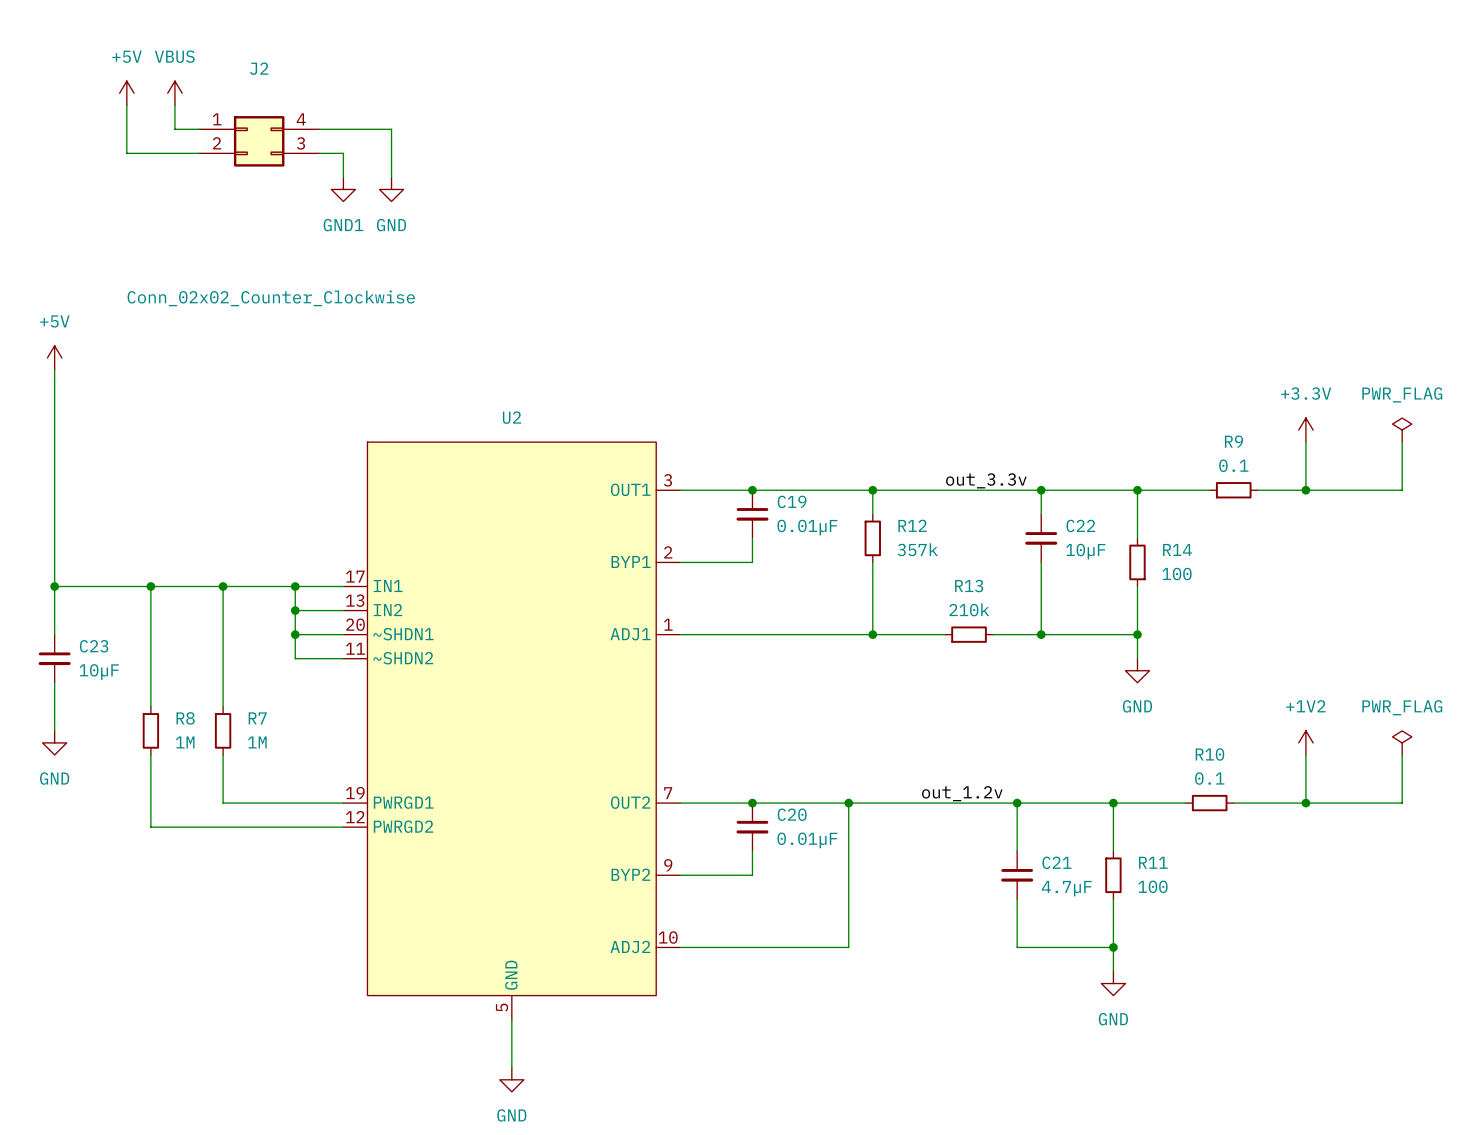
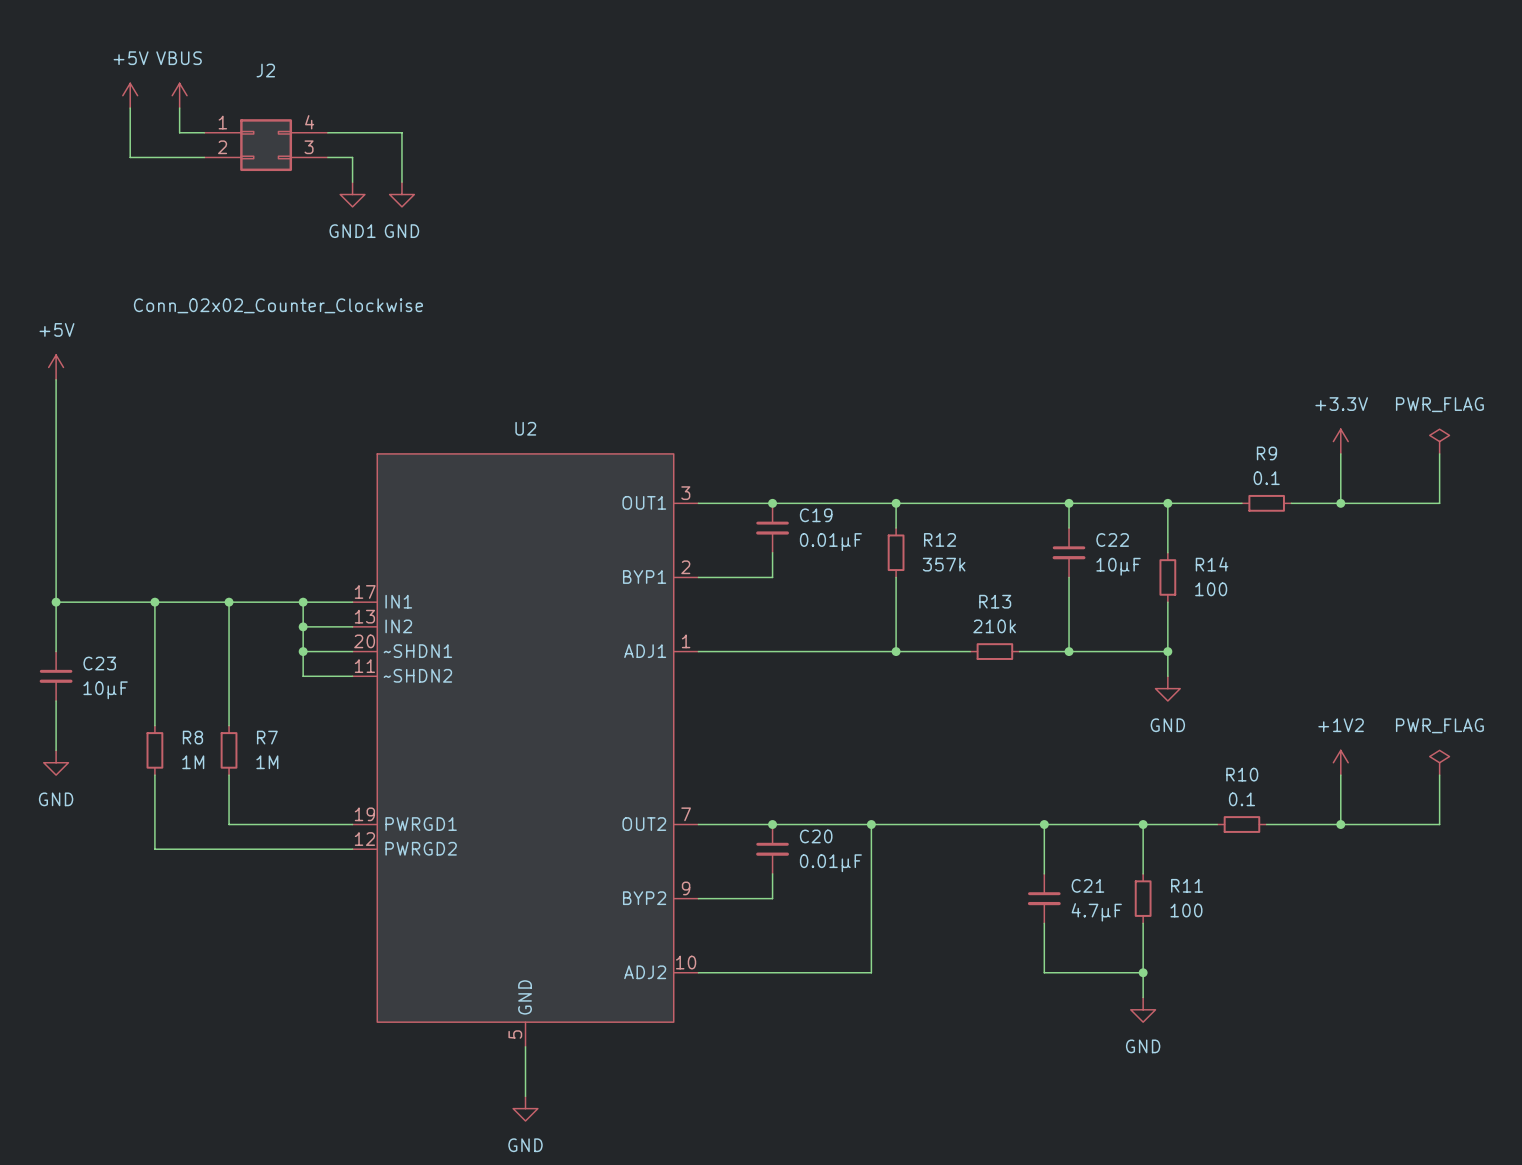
label: out_3.3v (986, 480) -> none
label: out_1.2v (962, 793) -> none

